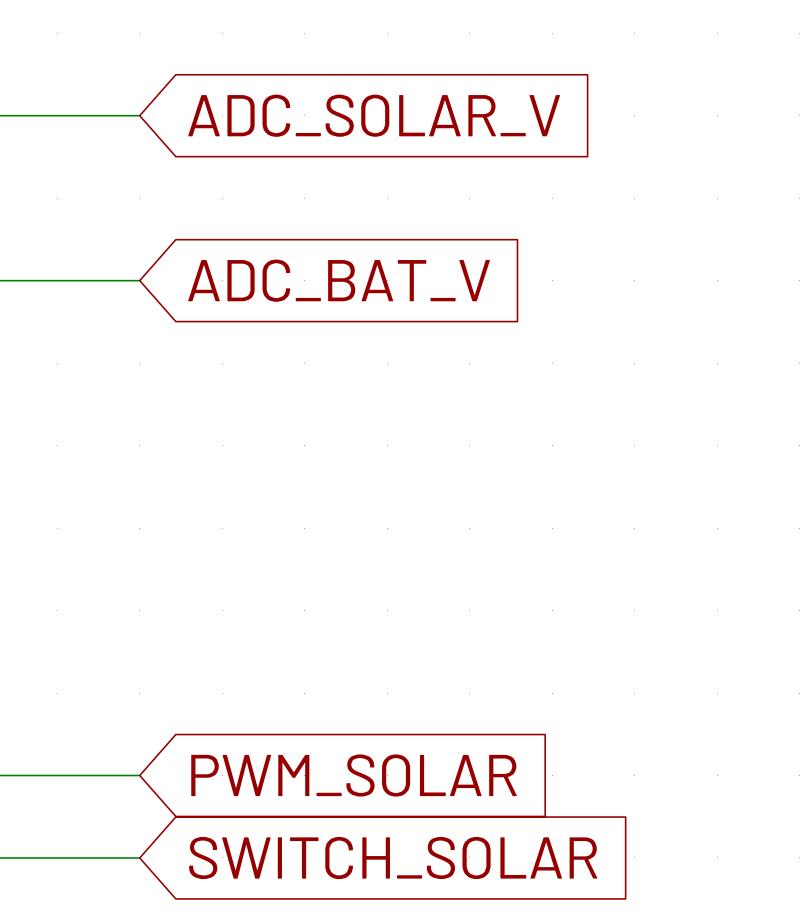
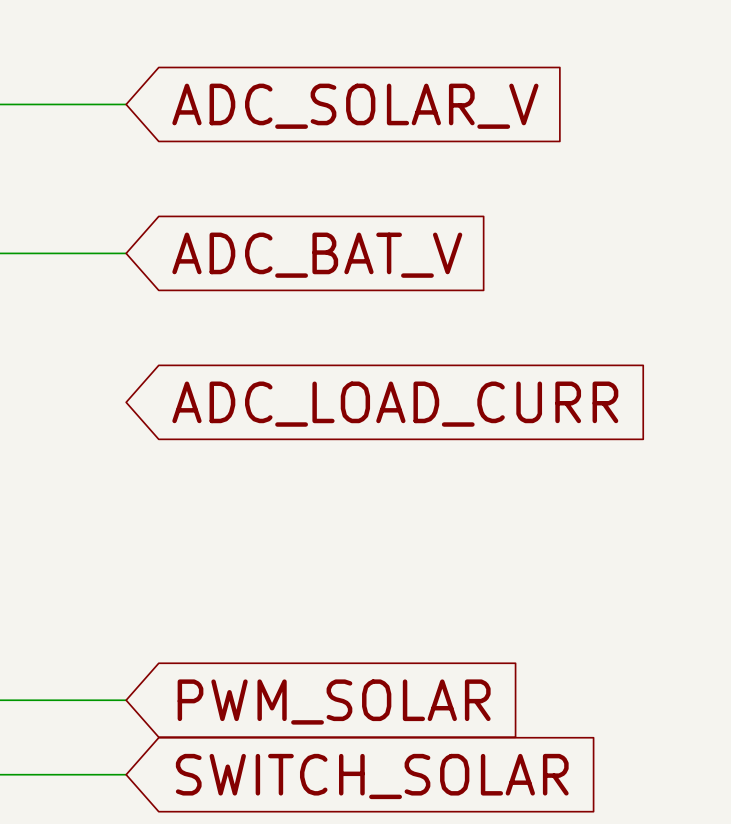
global label: none -> ADC_LOAD_CURR (395, 404)

